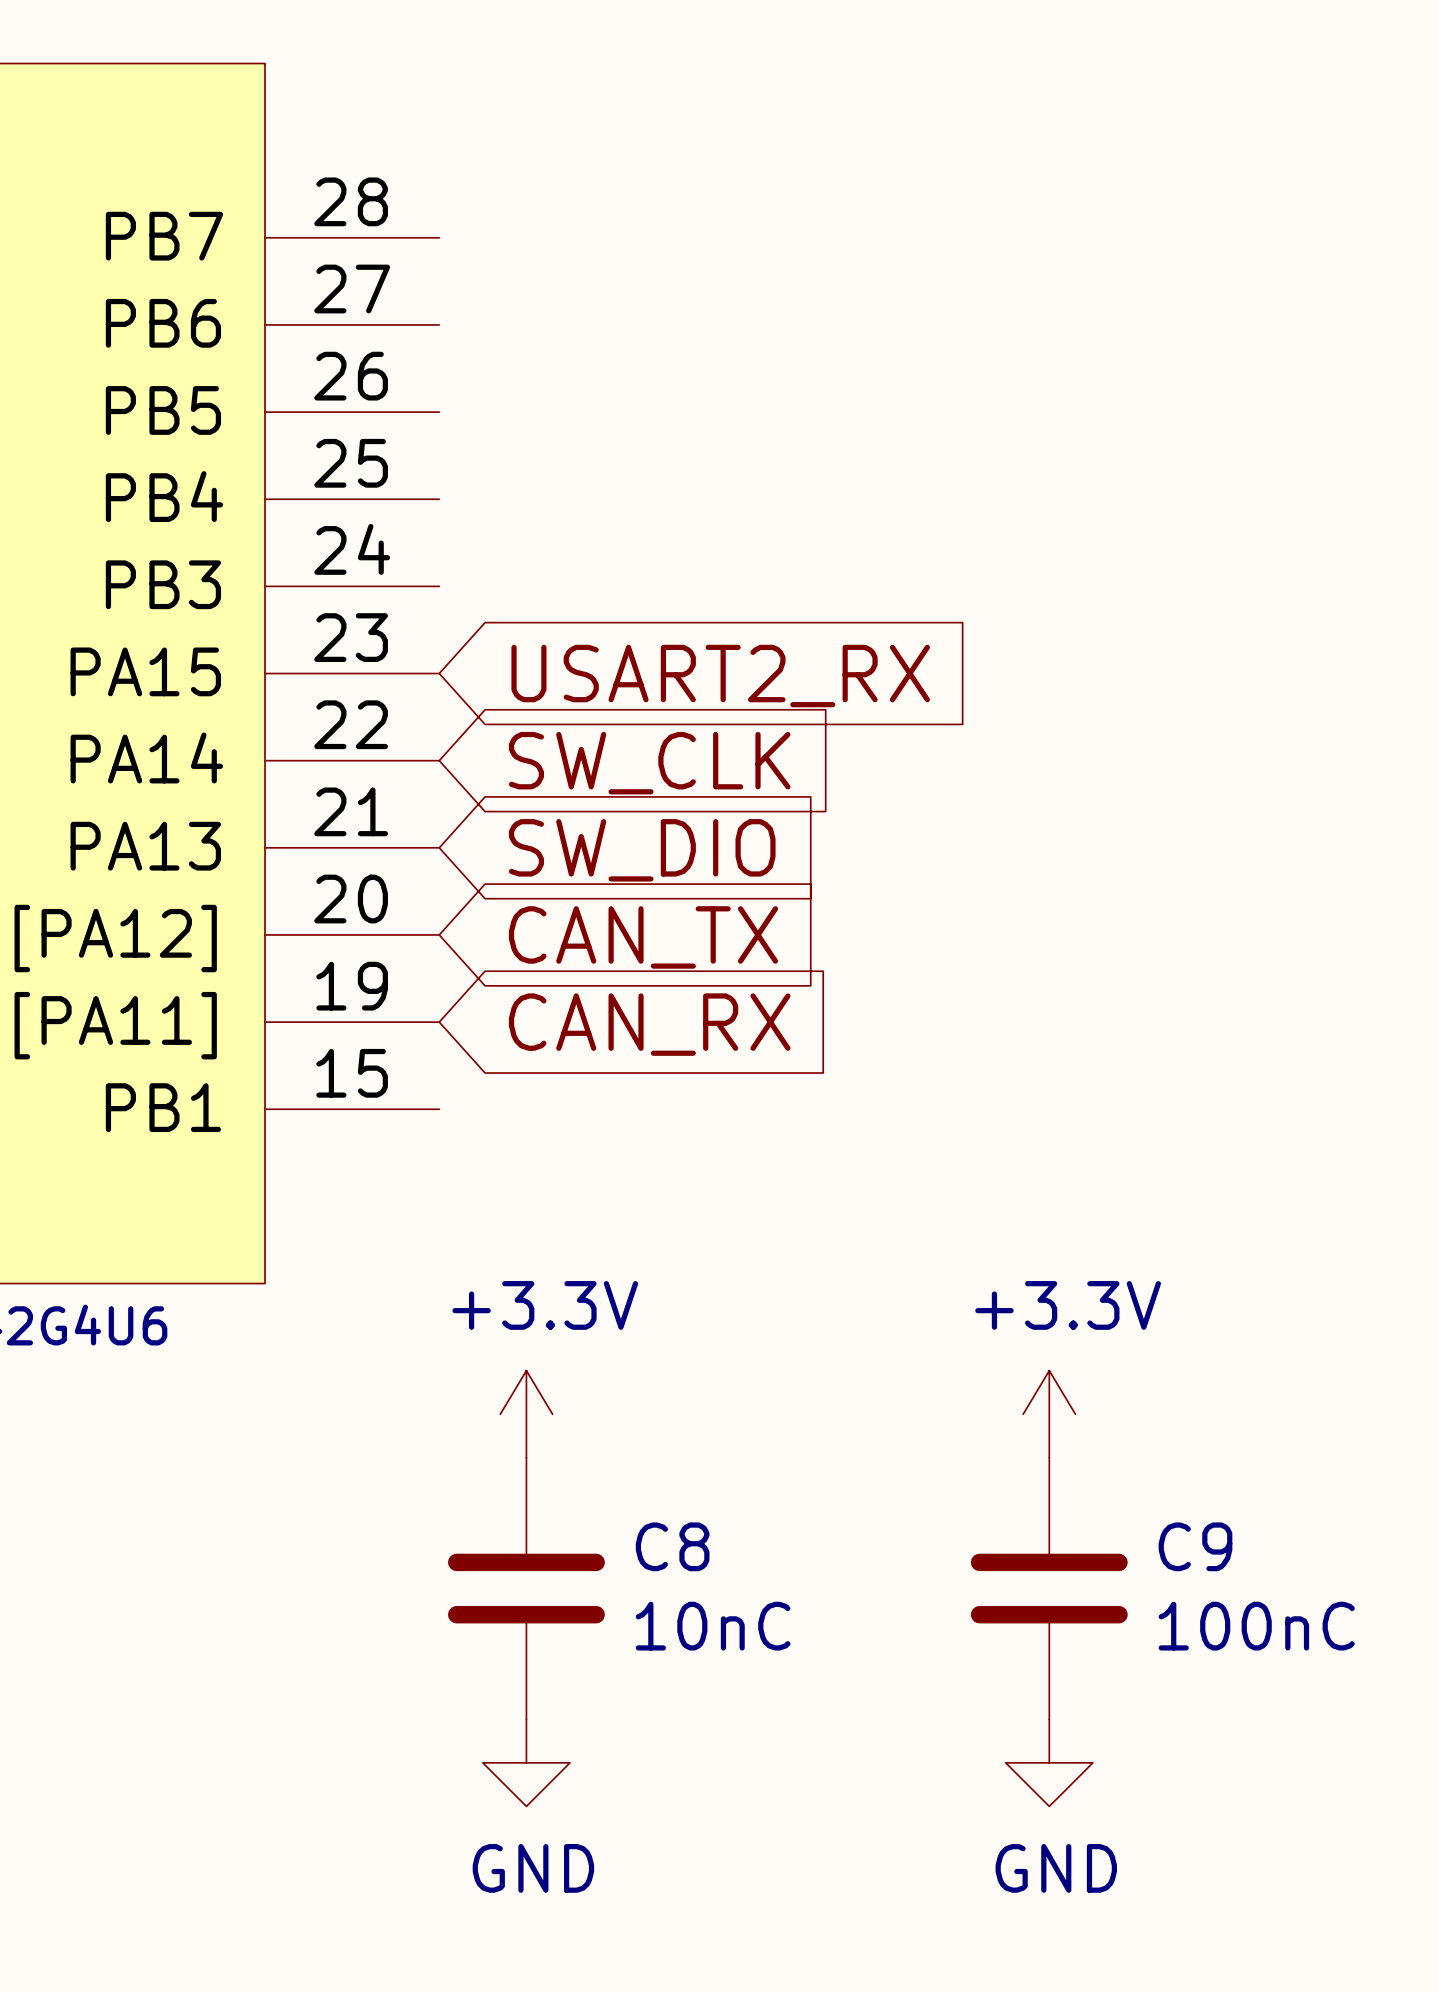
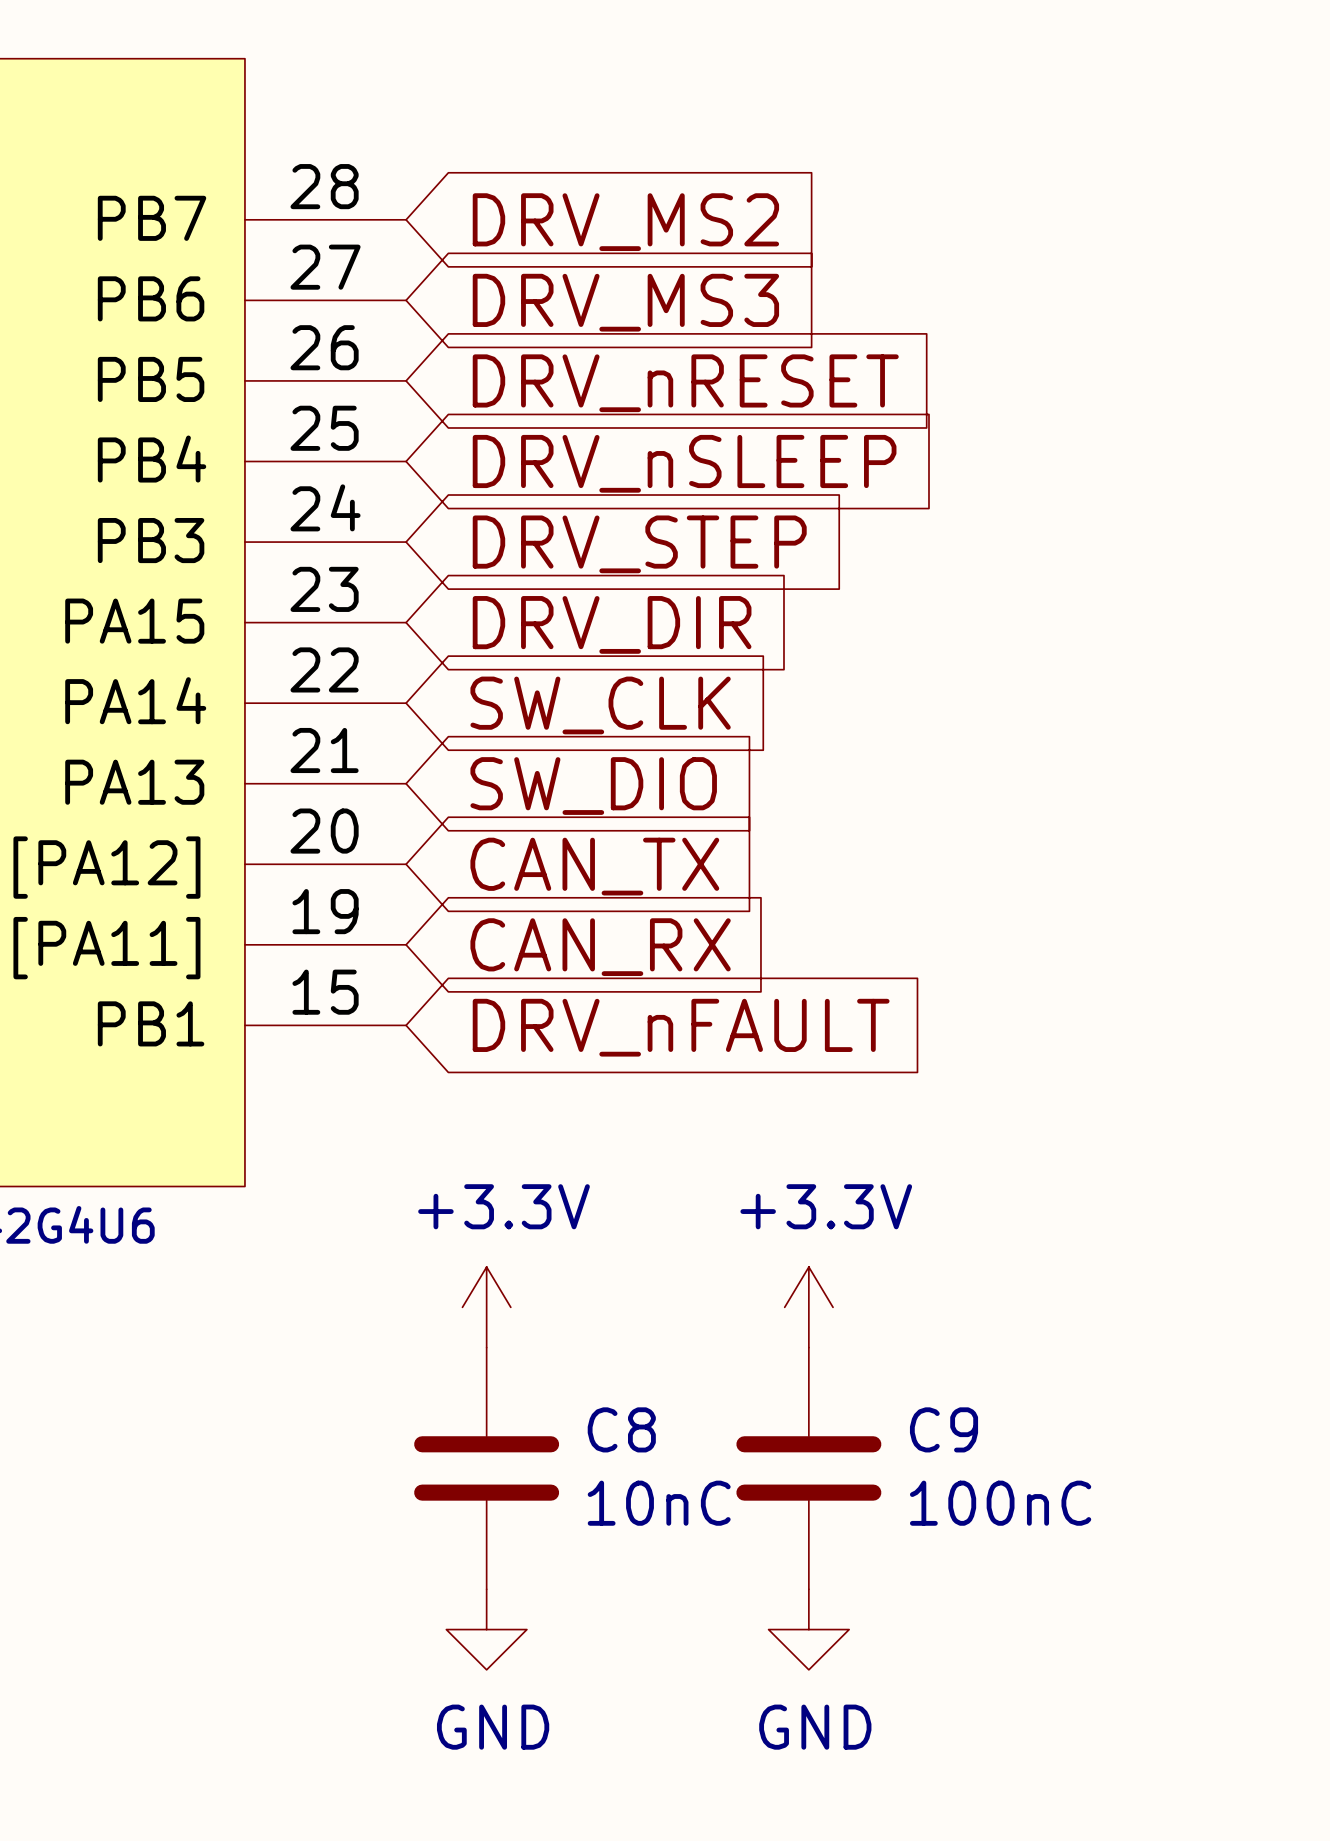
global label: none -> DRV_MS2 (625, 222)
global label: none -> DRV_MS3 (625, 302)
global label: none -> DRV_nRESET (685, 383)
global label: none -> DRV_nSLEEP (684, 463)
global label: none -> DRV_STEP (639, 544)
global label: USART2_RX (720, 676) -> DRV_DIR (612, 624)
global label: none -> DRV_nFAULT (681, 1027)
power symbol position: +3.3V (1049, 1414) -> +3.3V (808, 1307)
C9 position: (1049, 1588) -> (808, 1468)
power symbol position: GND (1049, 1762) -> GND (808, 1629)

